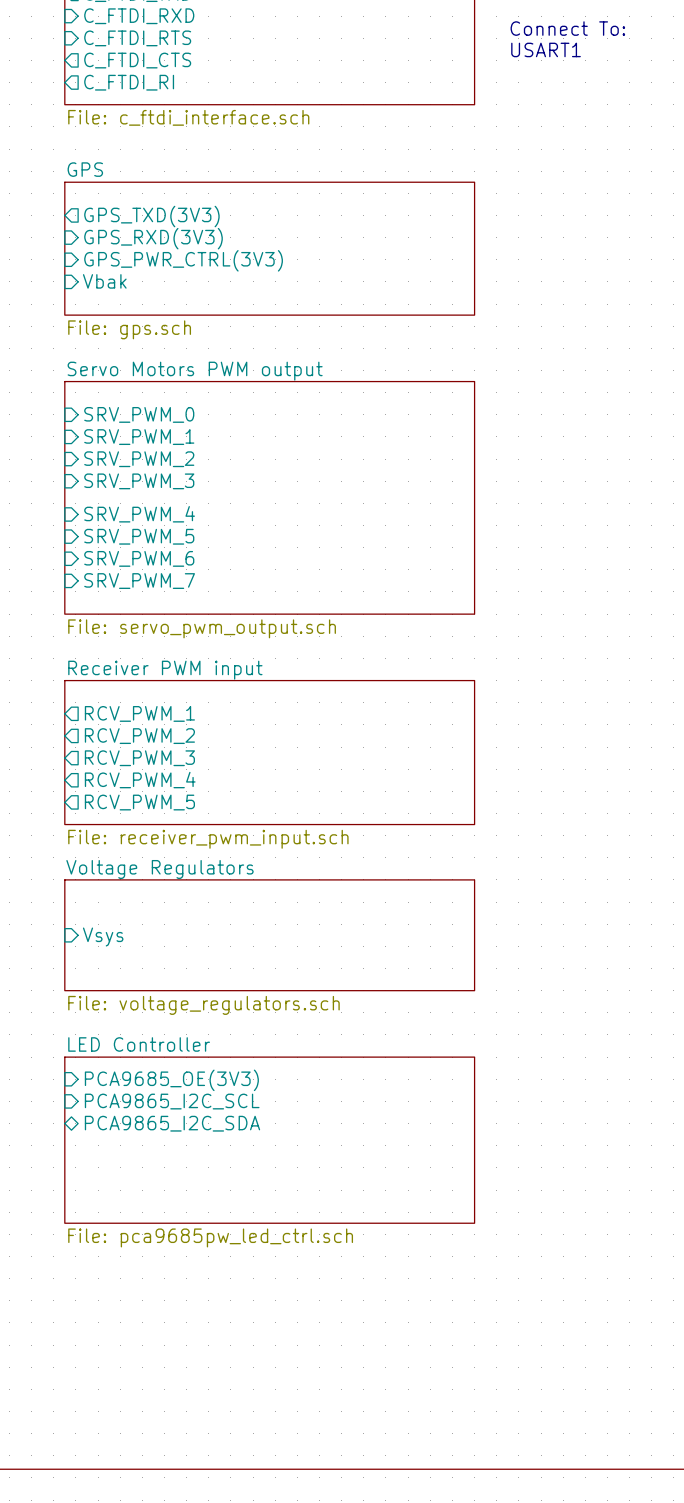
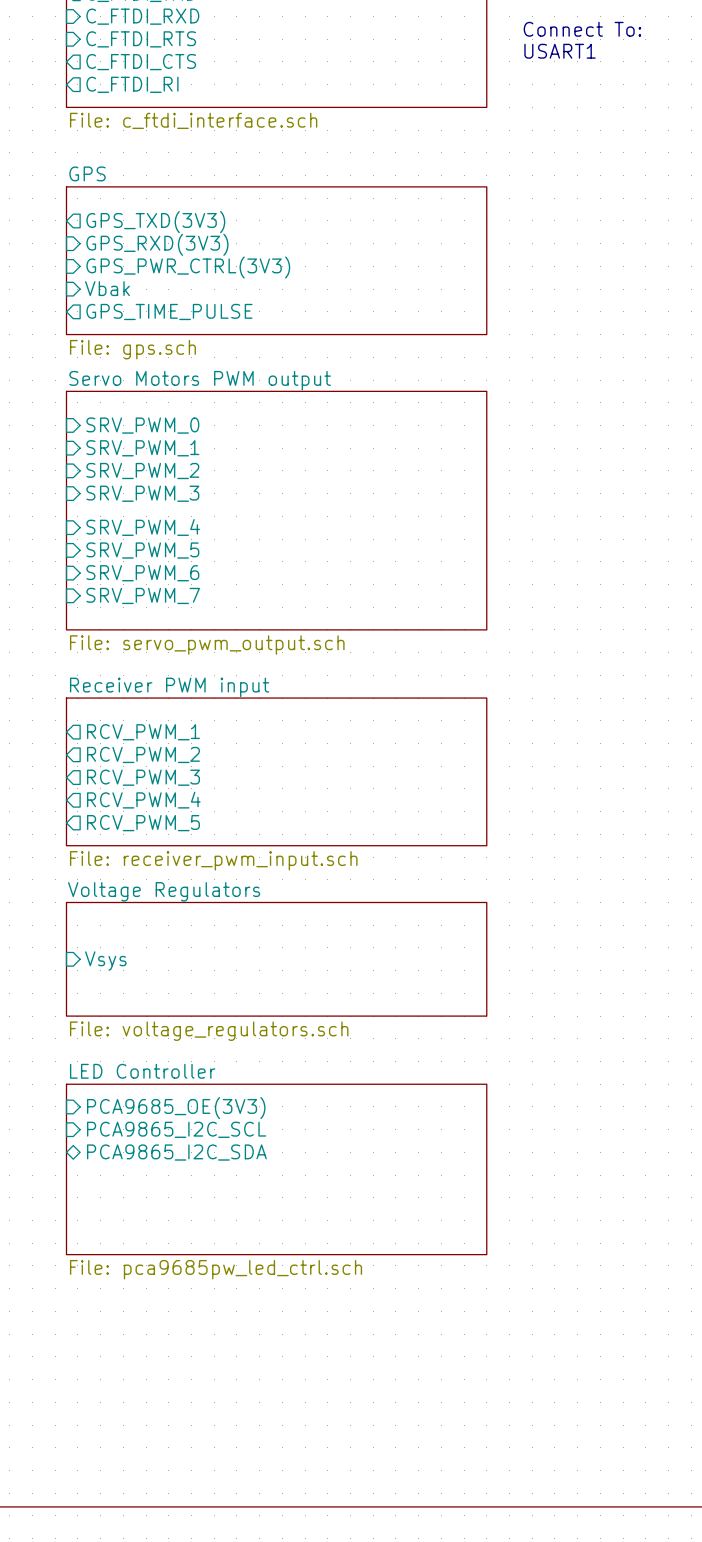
sheet GPS shape: [64, 182, 475, 316] -> [66, 186, 487, 335]
sheet pin: none -> GPS_TIME_PULSE (169, 311)

